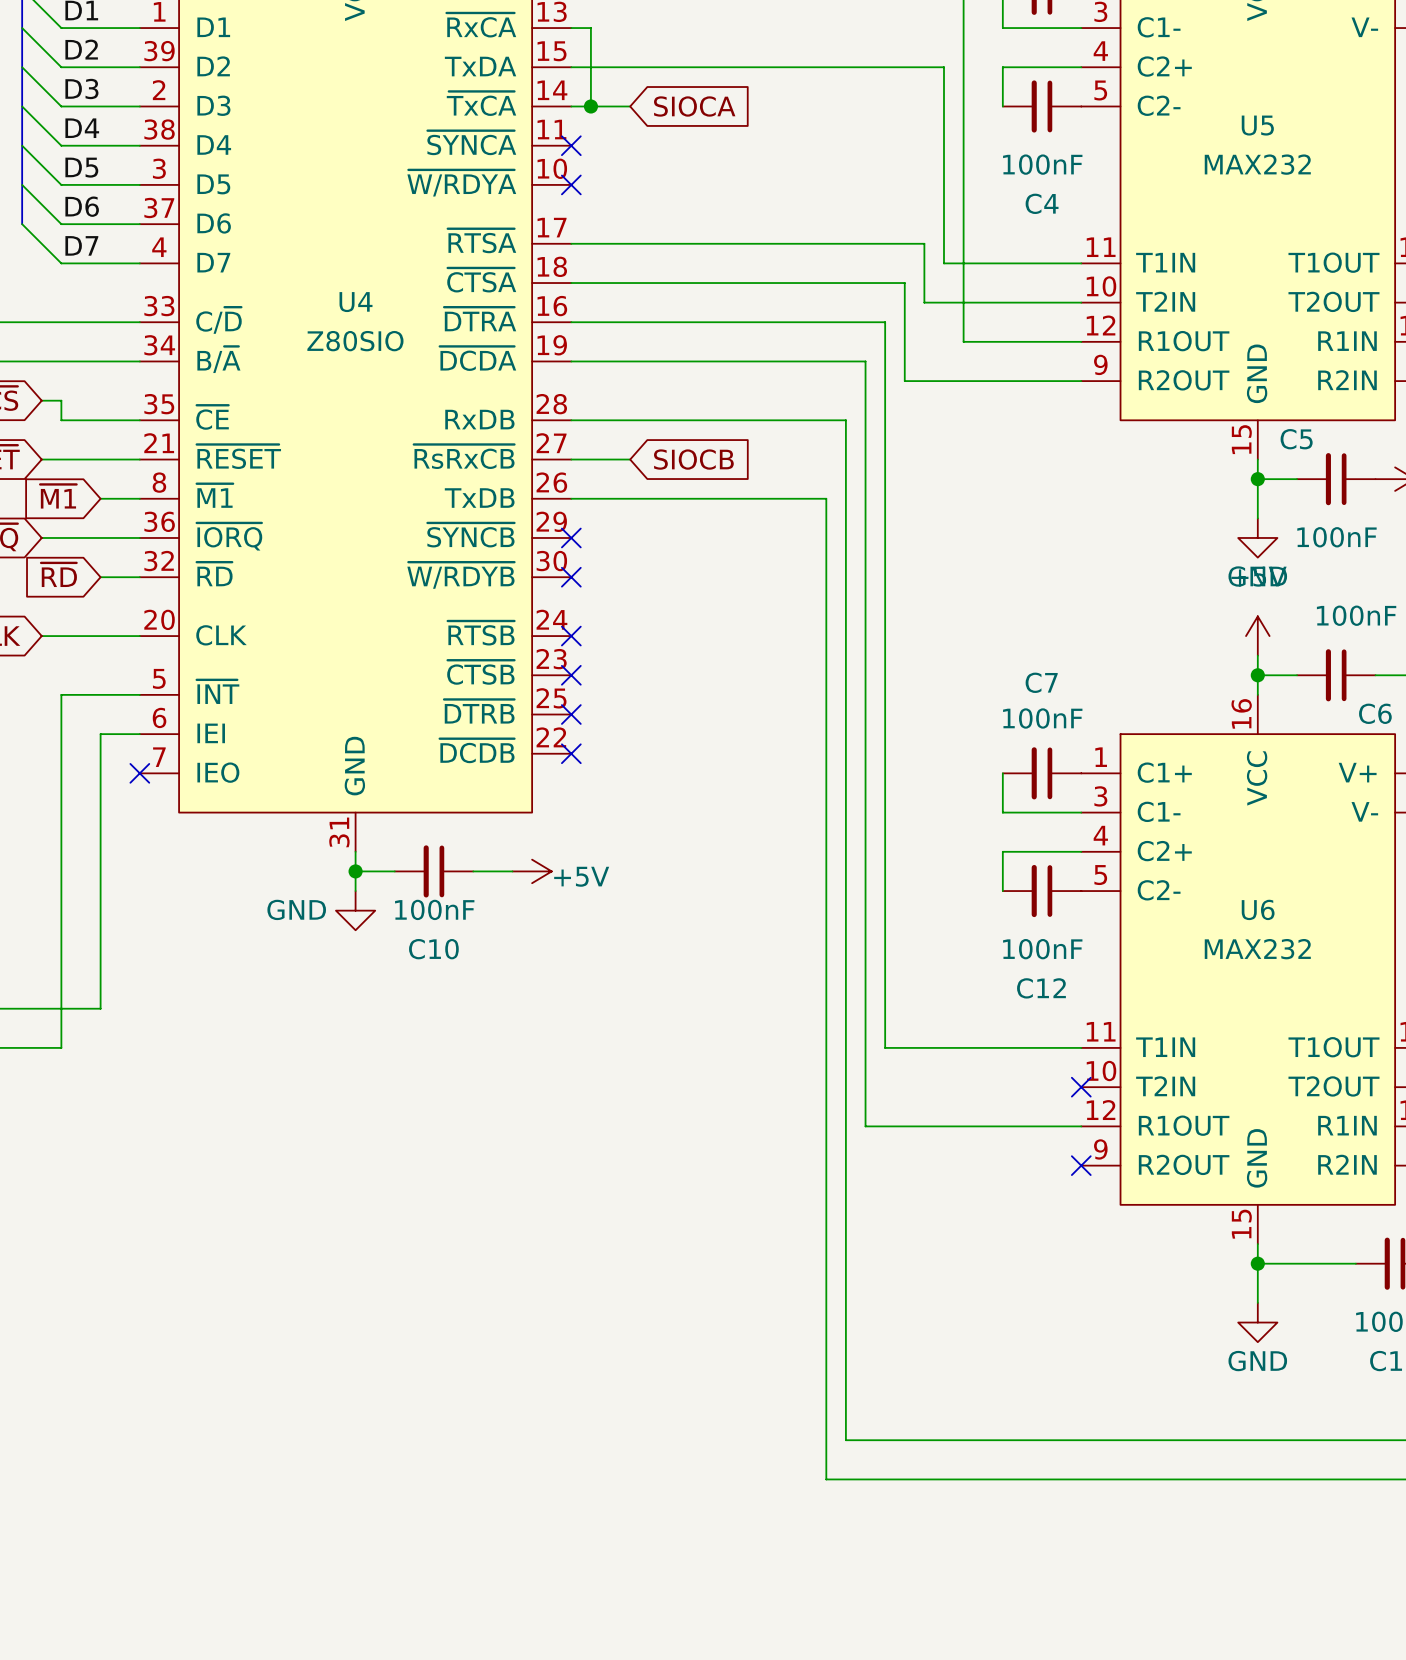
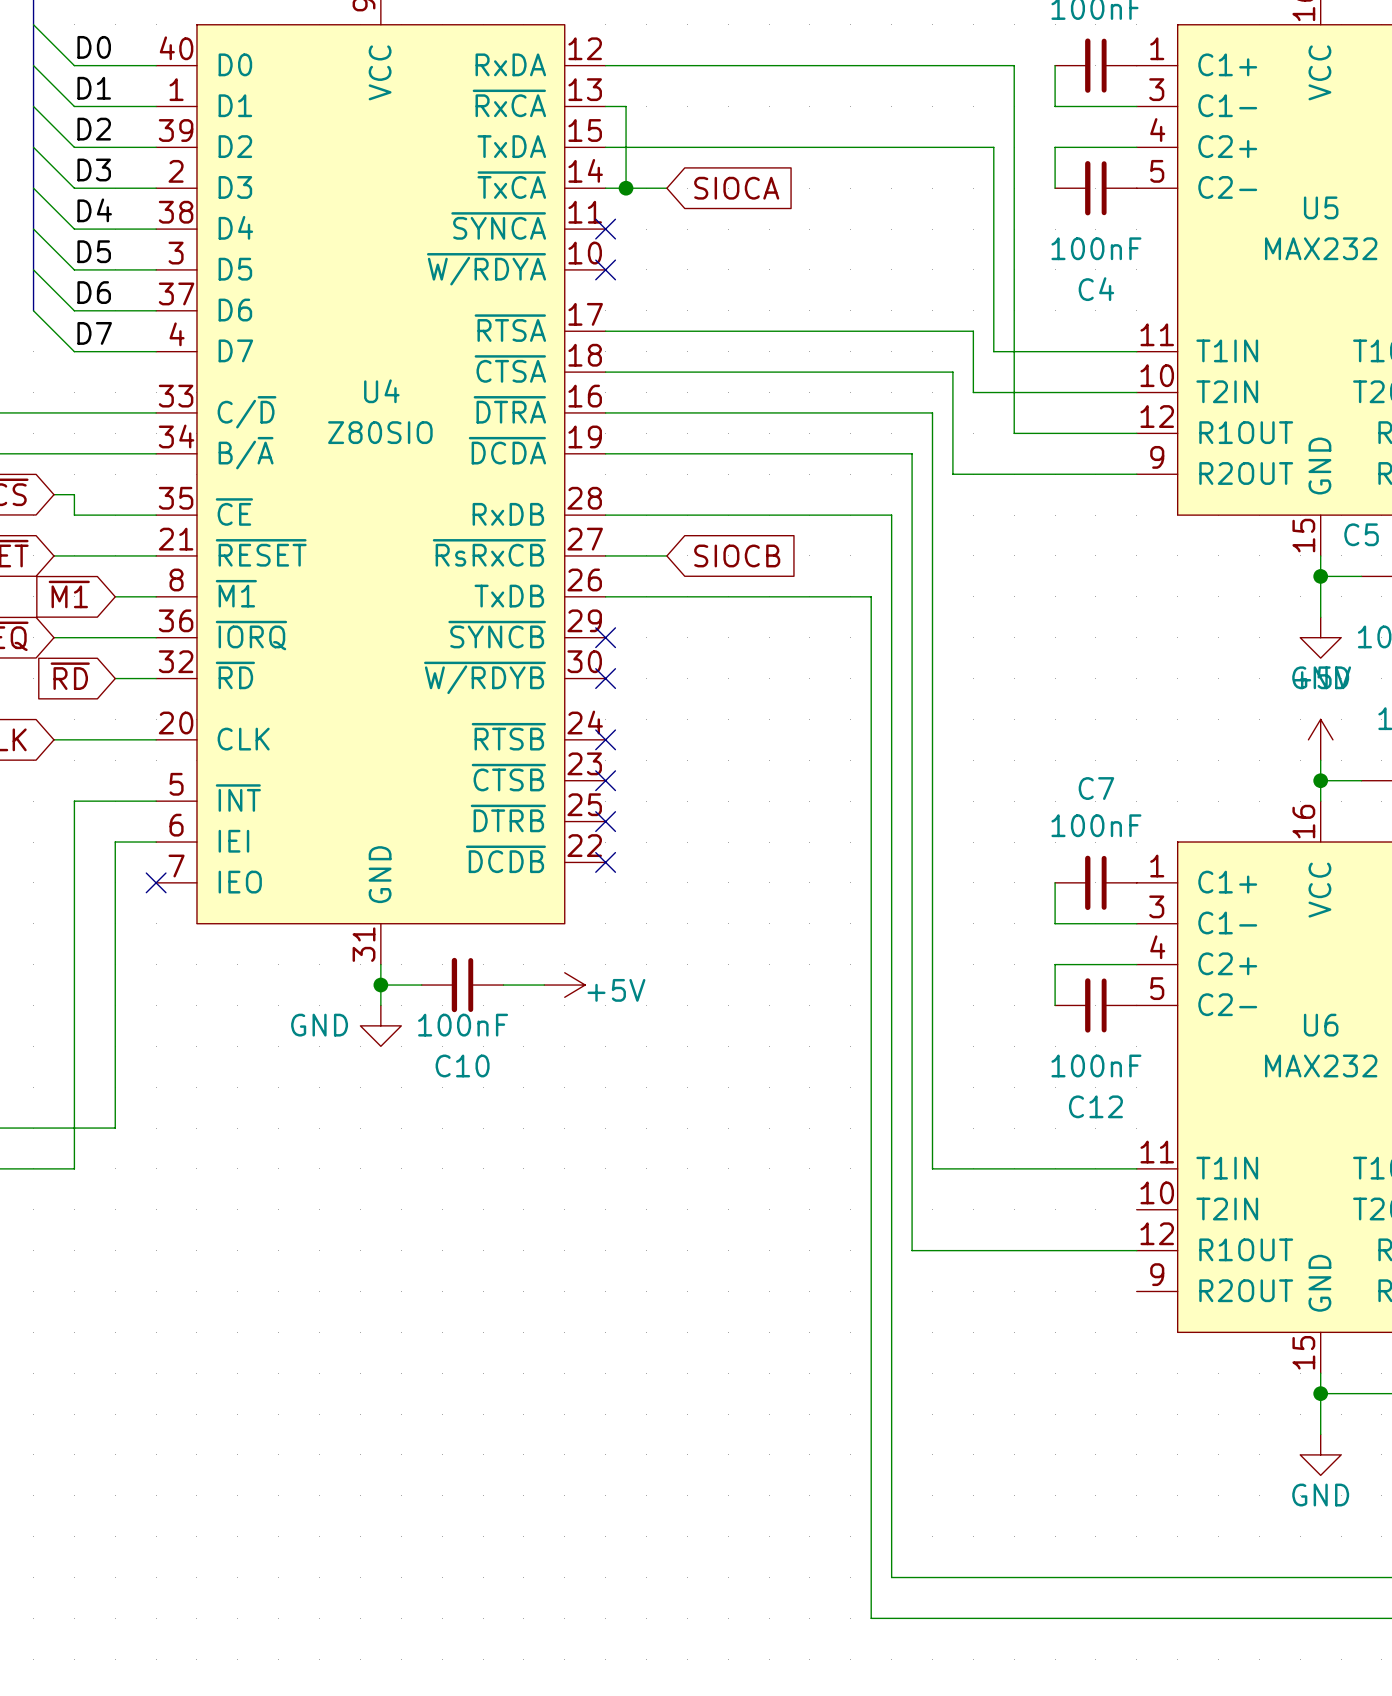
no-connect mark: (1081, 1087) -> none
no-connect mark: (1081, 1165) -> none

